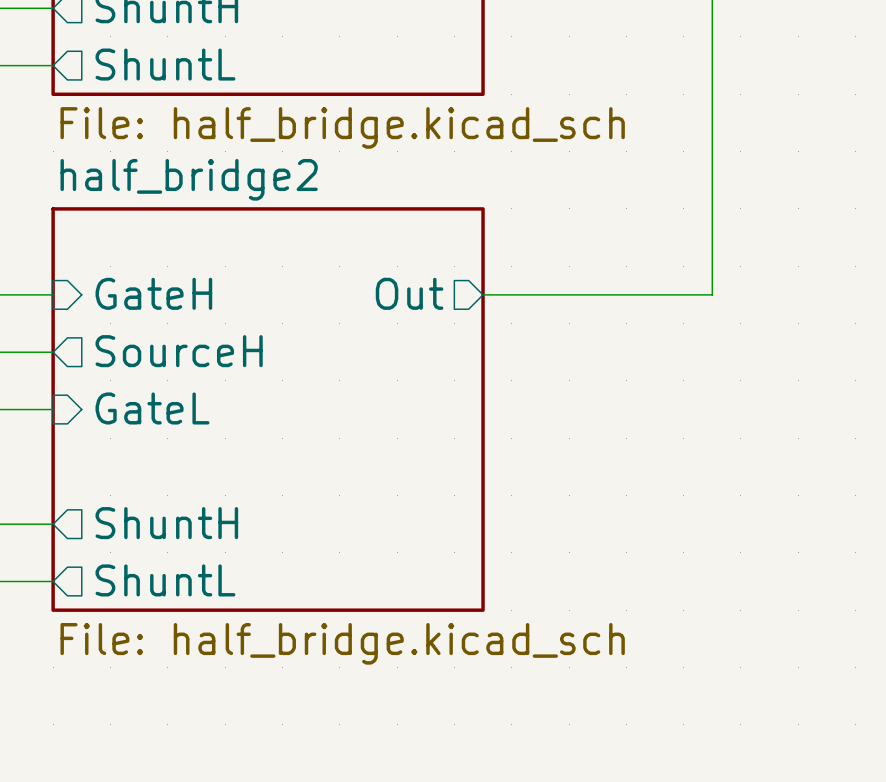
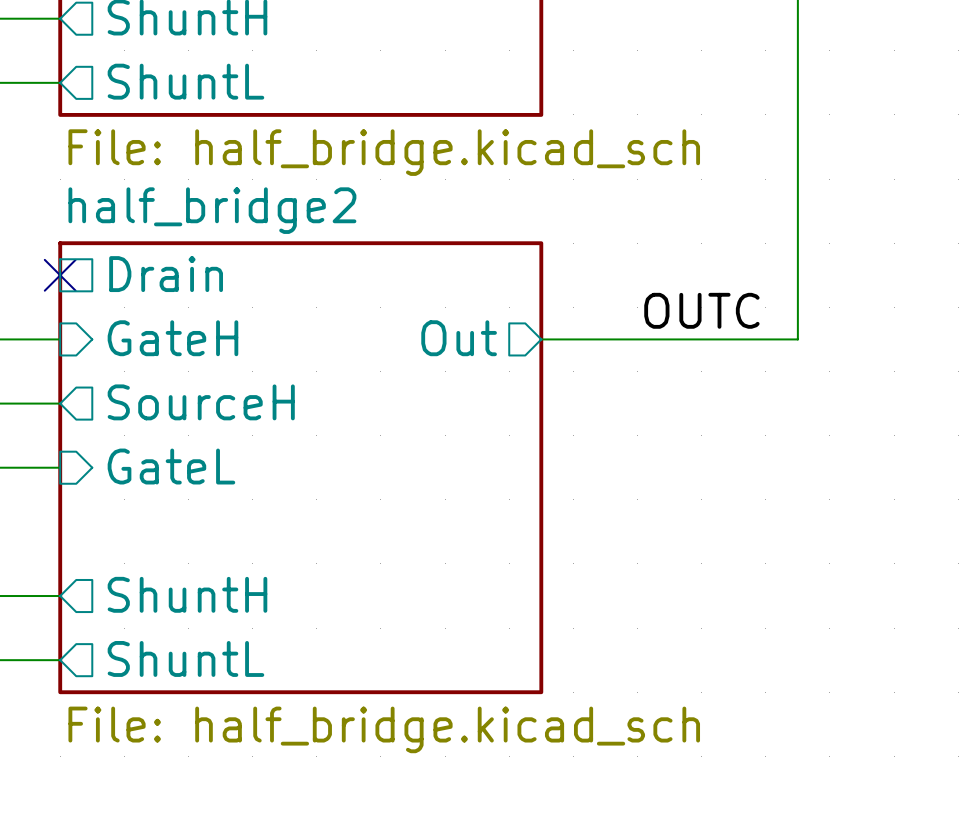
sheet pin: none -> Drain (166, 274)
no-connect mark: none -> (60, 275)
label: none -> OUTC (701, 310)

